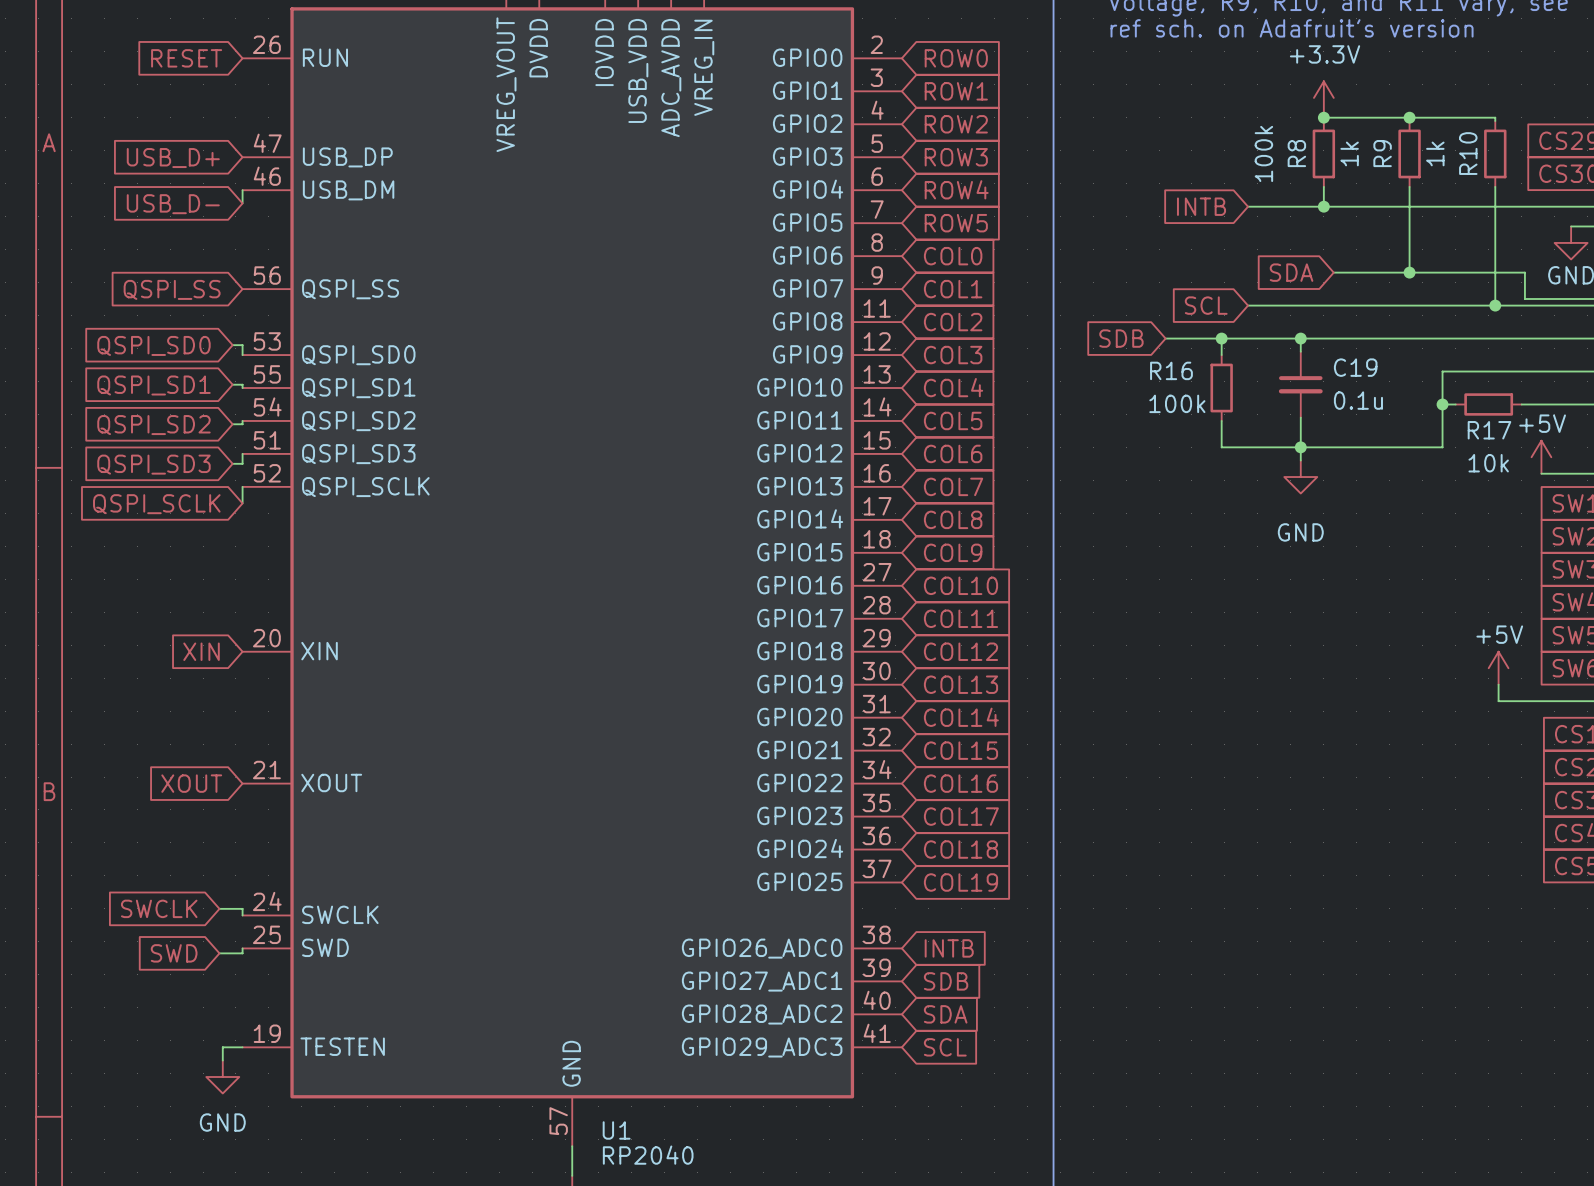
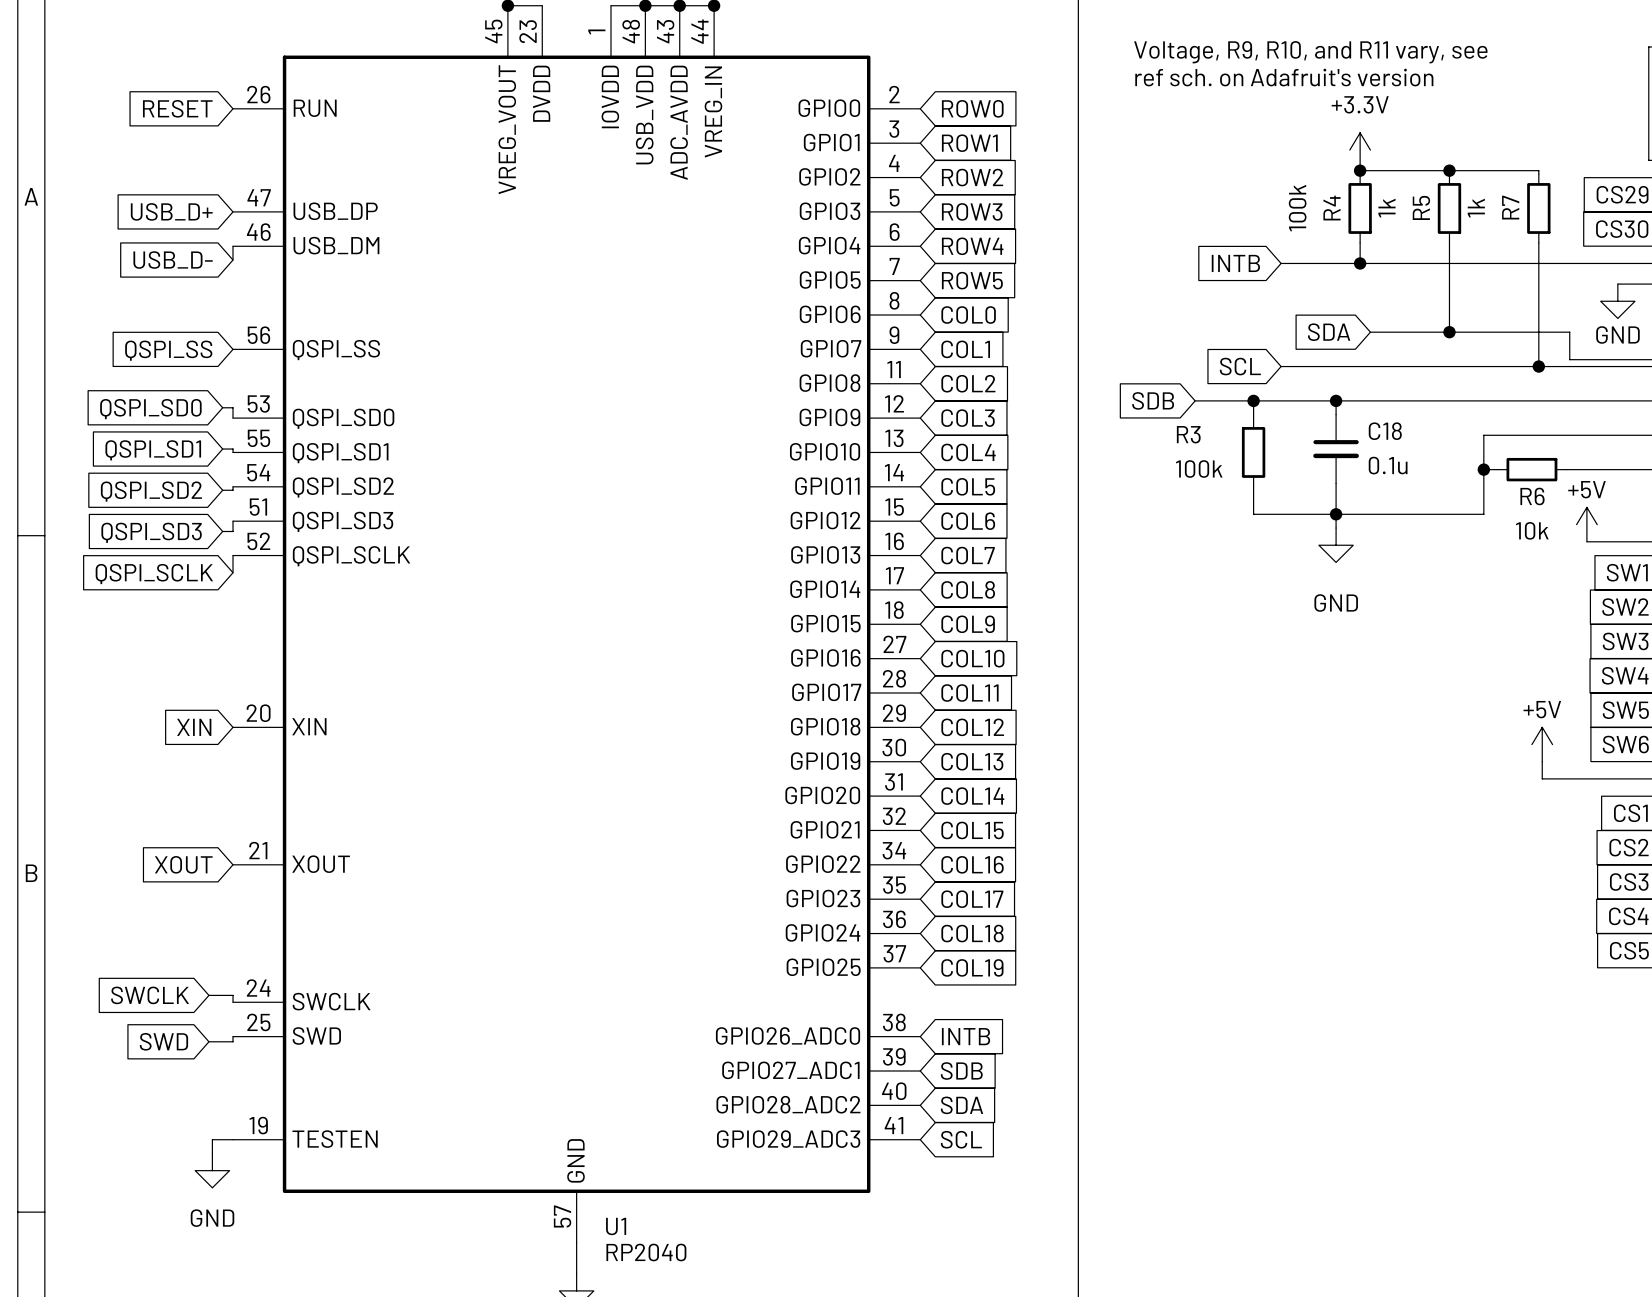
R8 name: R8 (1296, 153) -> R4 (1331, 208)
R9 name: R9 (1382, 153) -> R5 (1421, 207)
R10 name: R10 (1468, 153) -> R7 (1510, 207)
C19 name: C19 (1355, 367) -> C18 (1385, 431)
R16 name: R16 (1171, 370) -> R3 (1188, 434)
R17 name: R17 (1489, 430) -> R6 (1532, 496)

